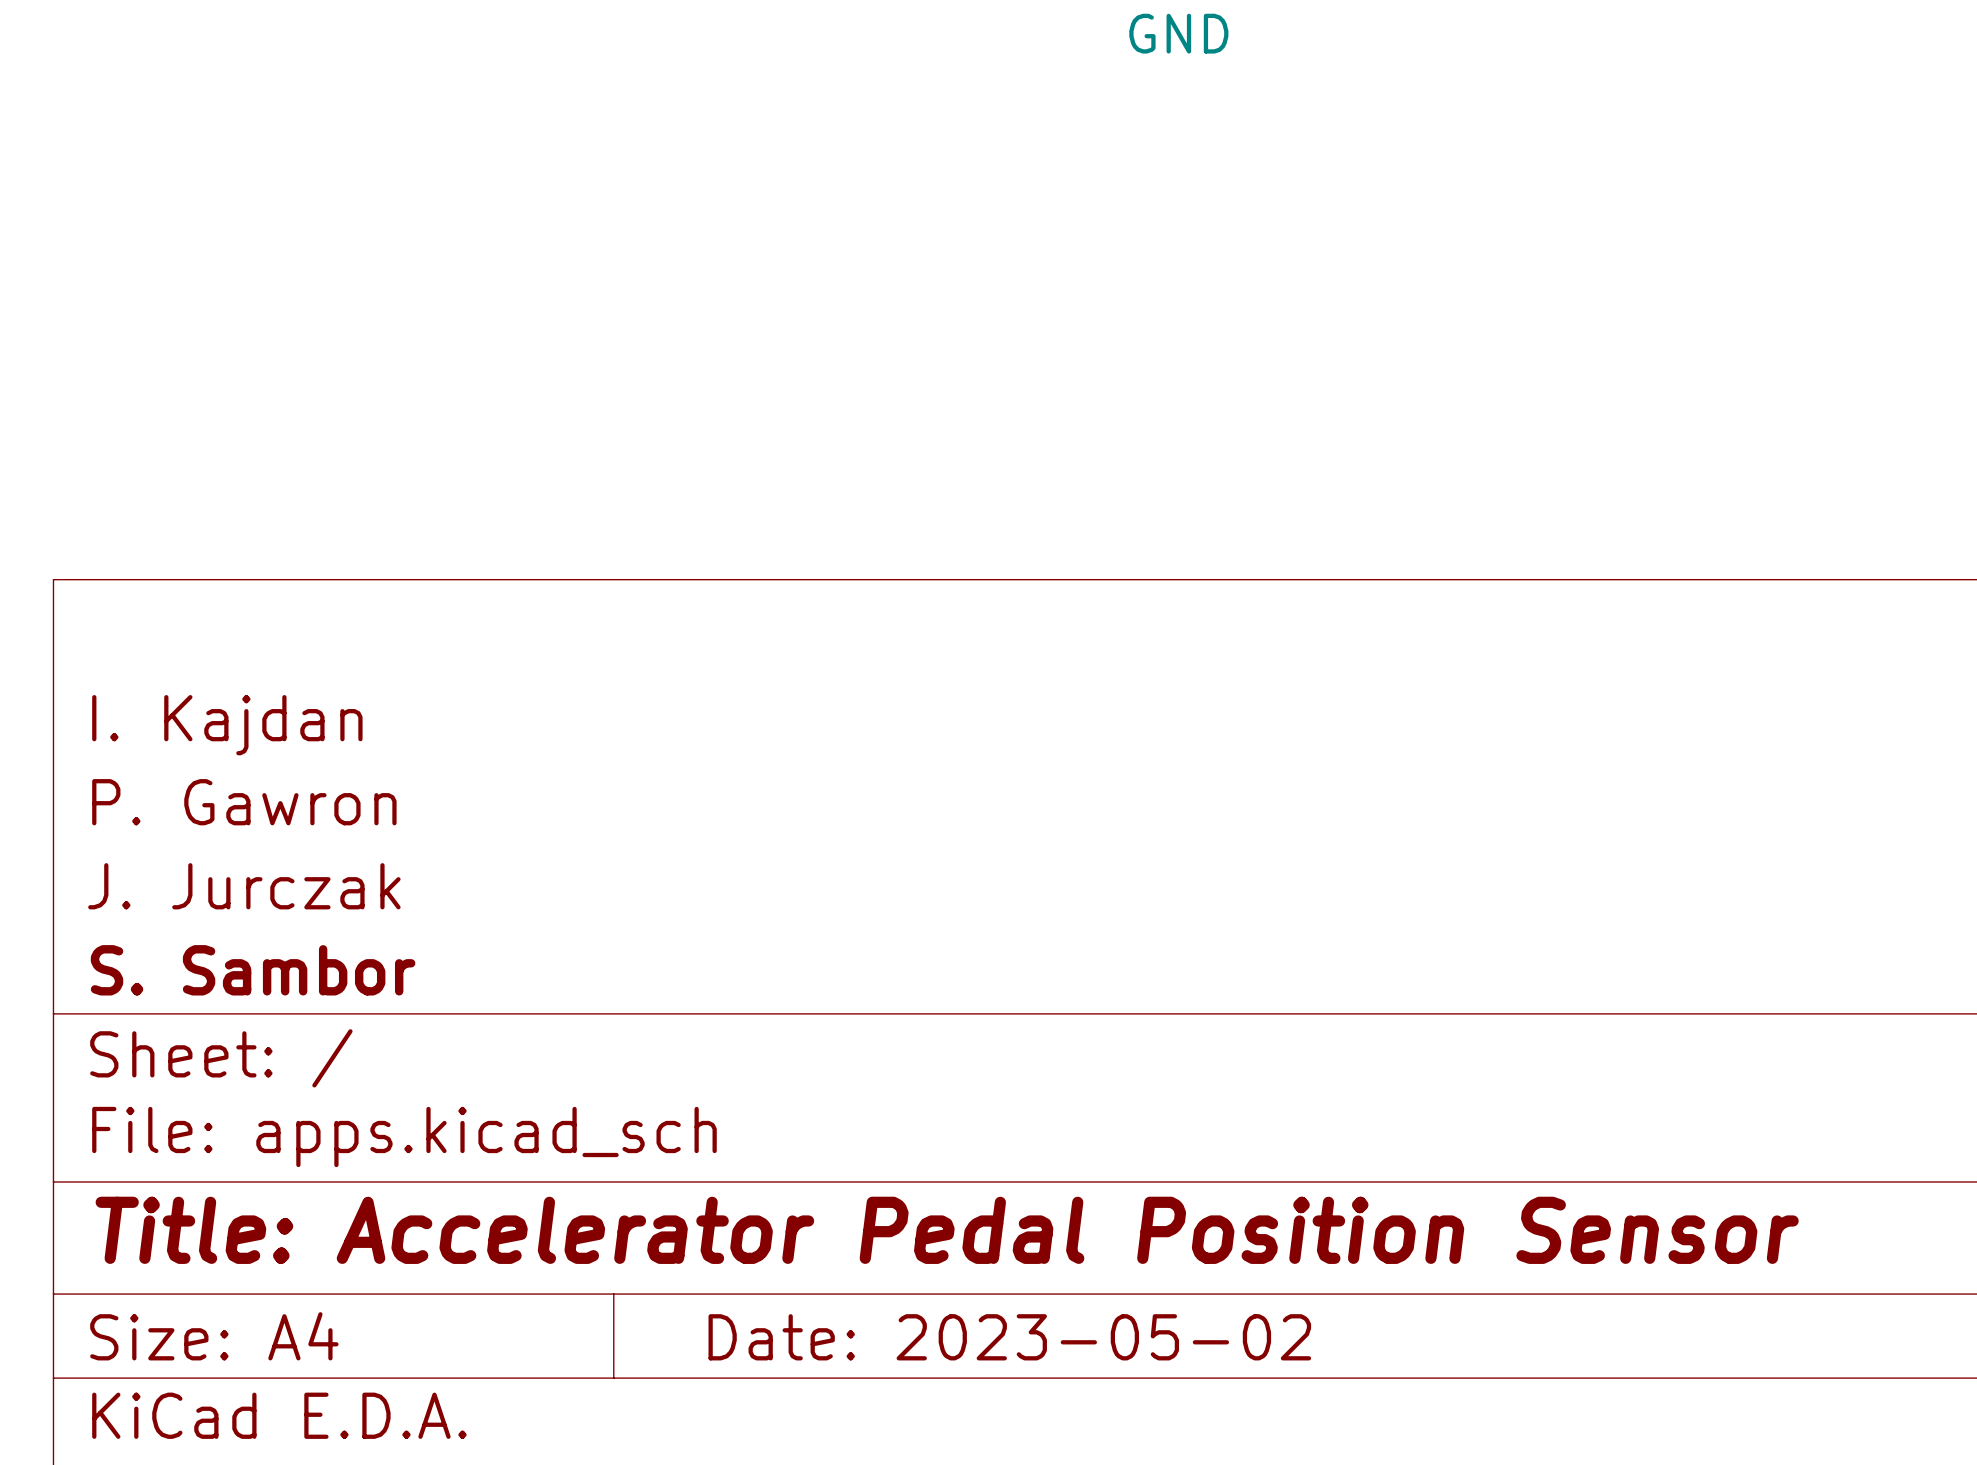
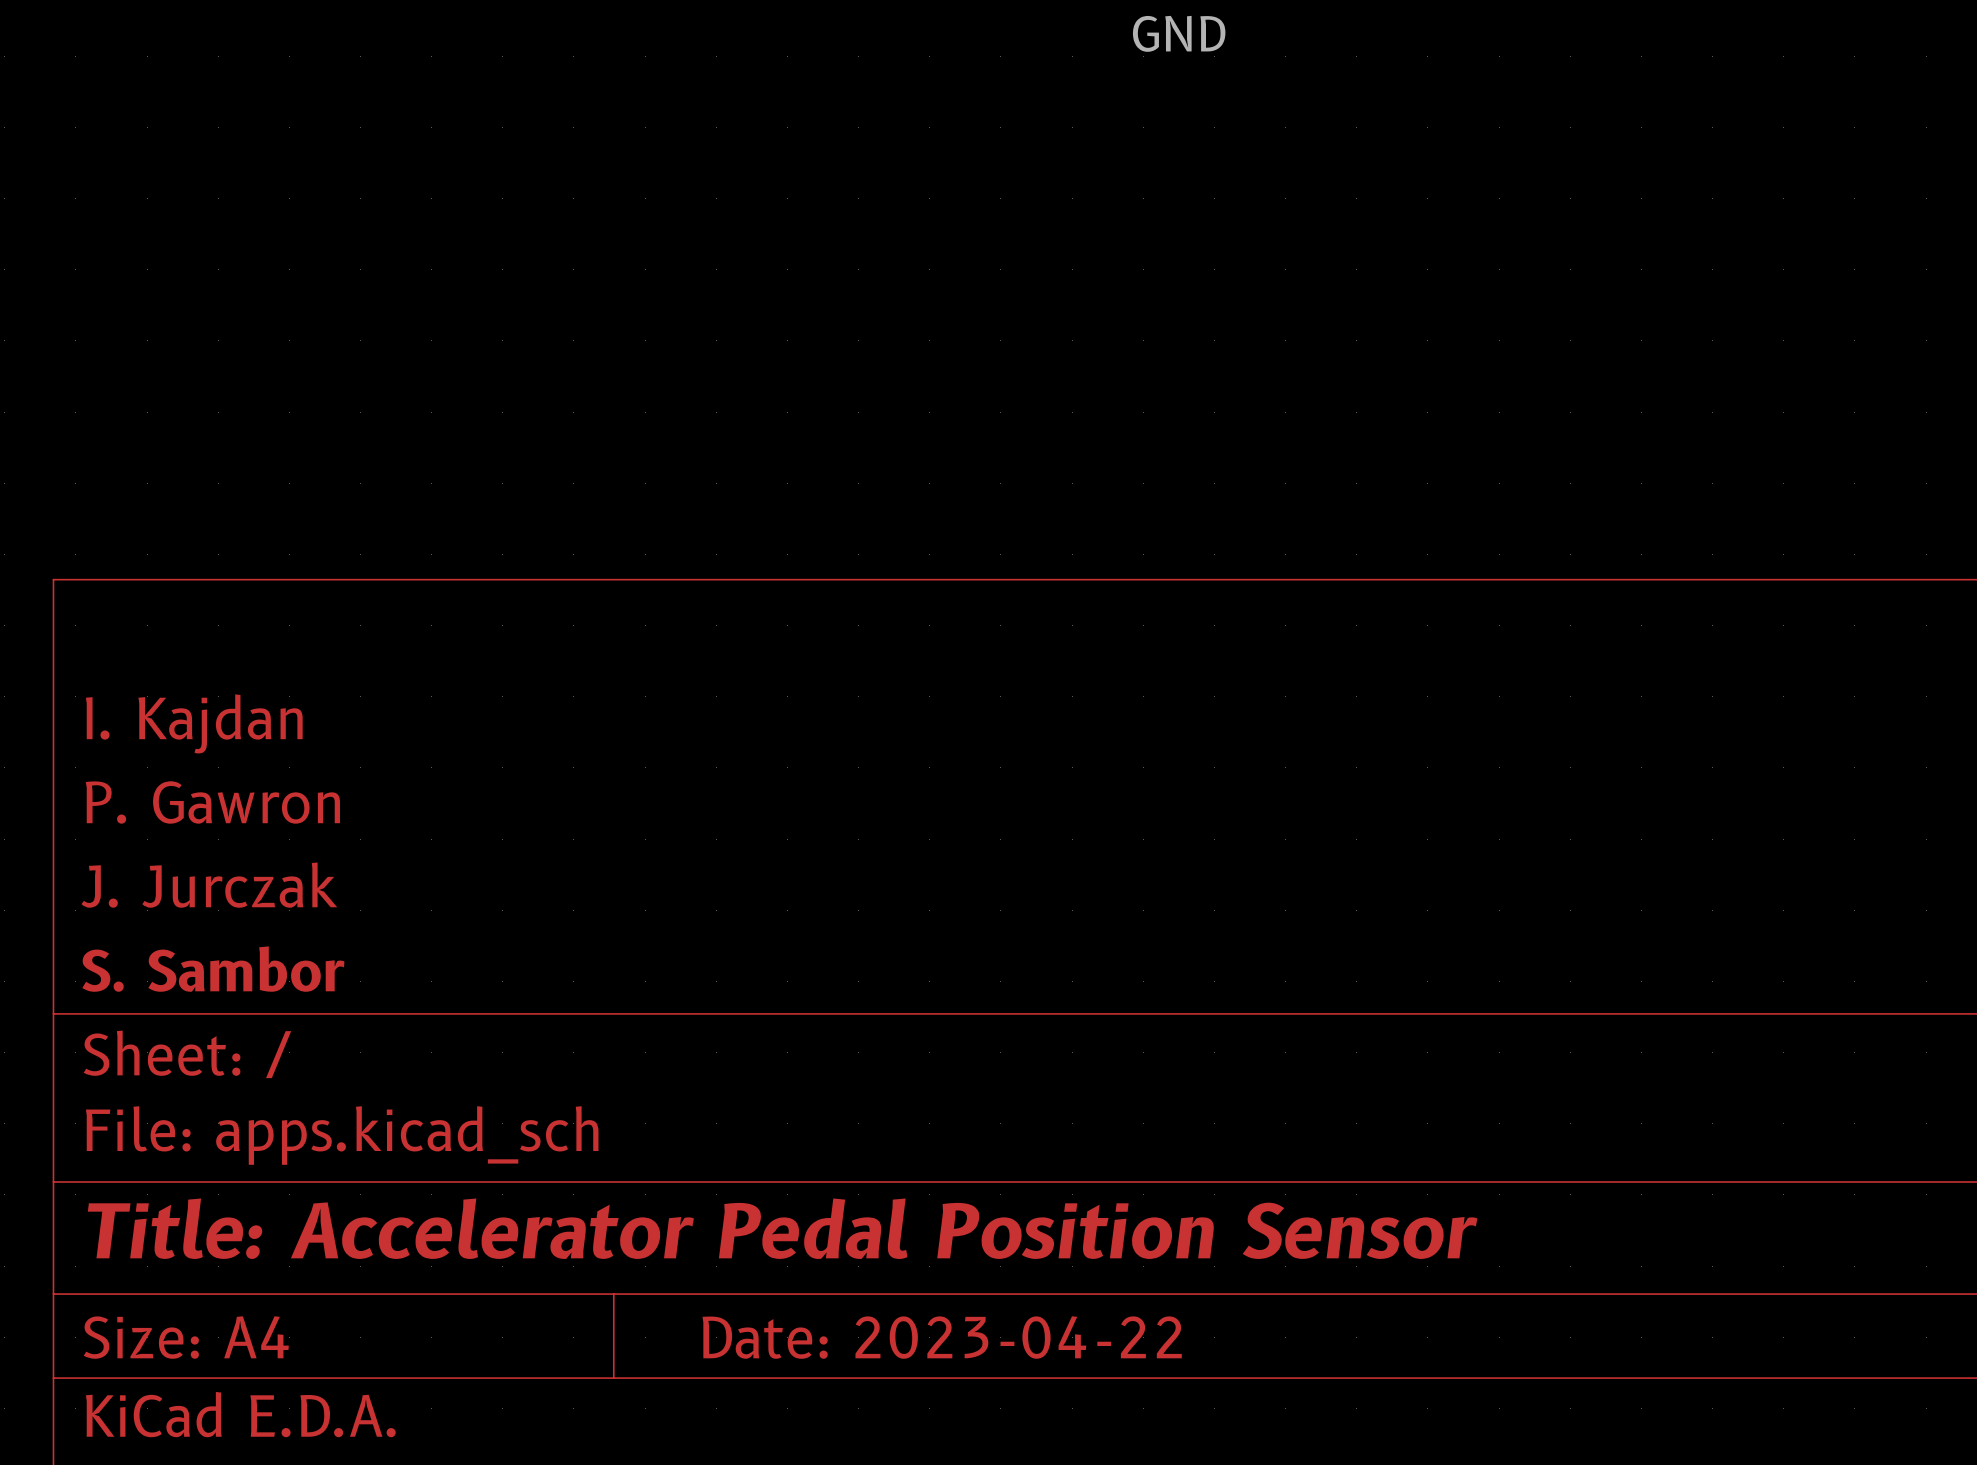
title block: Date: 2023-05-02 (1009, 1337) -> Date: 2023-04-22 (942, 1337)

